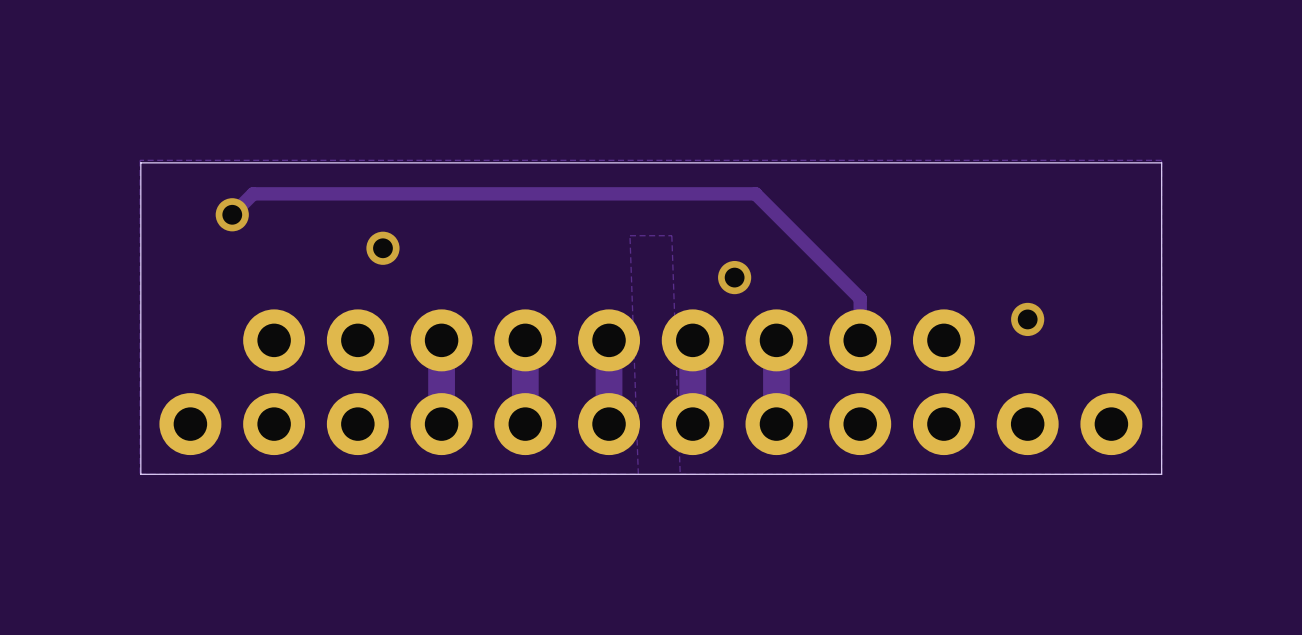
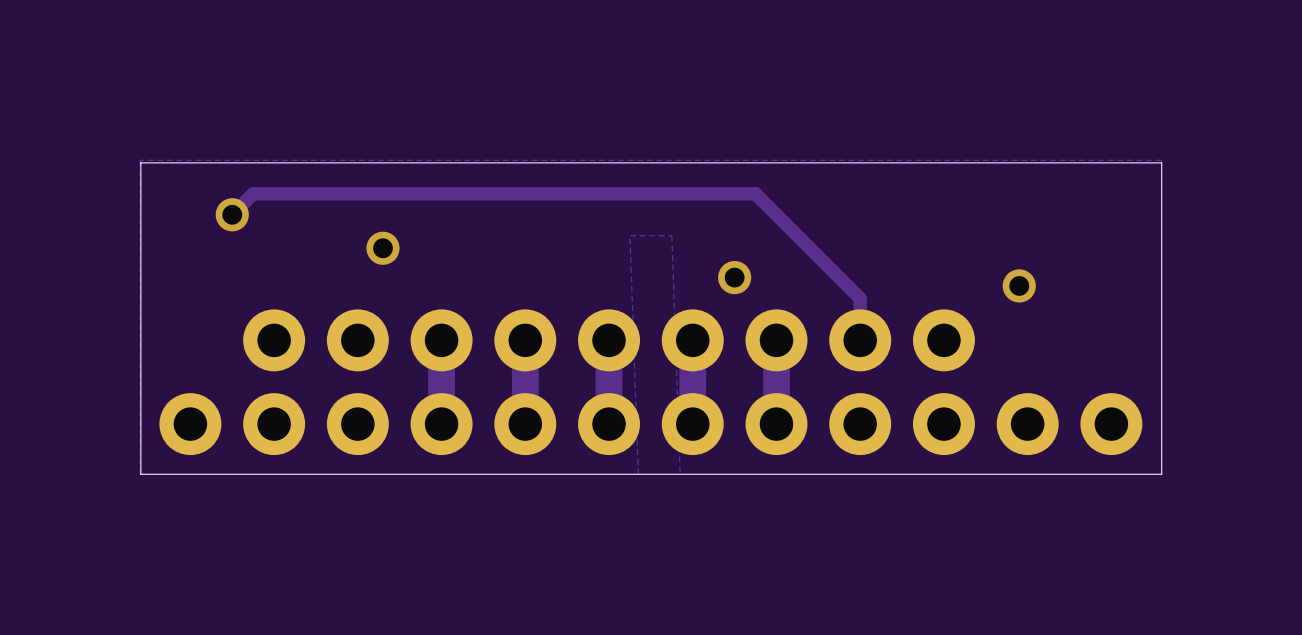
via position: (1027, 319) -> (1019, 285)

